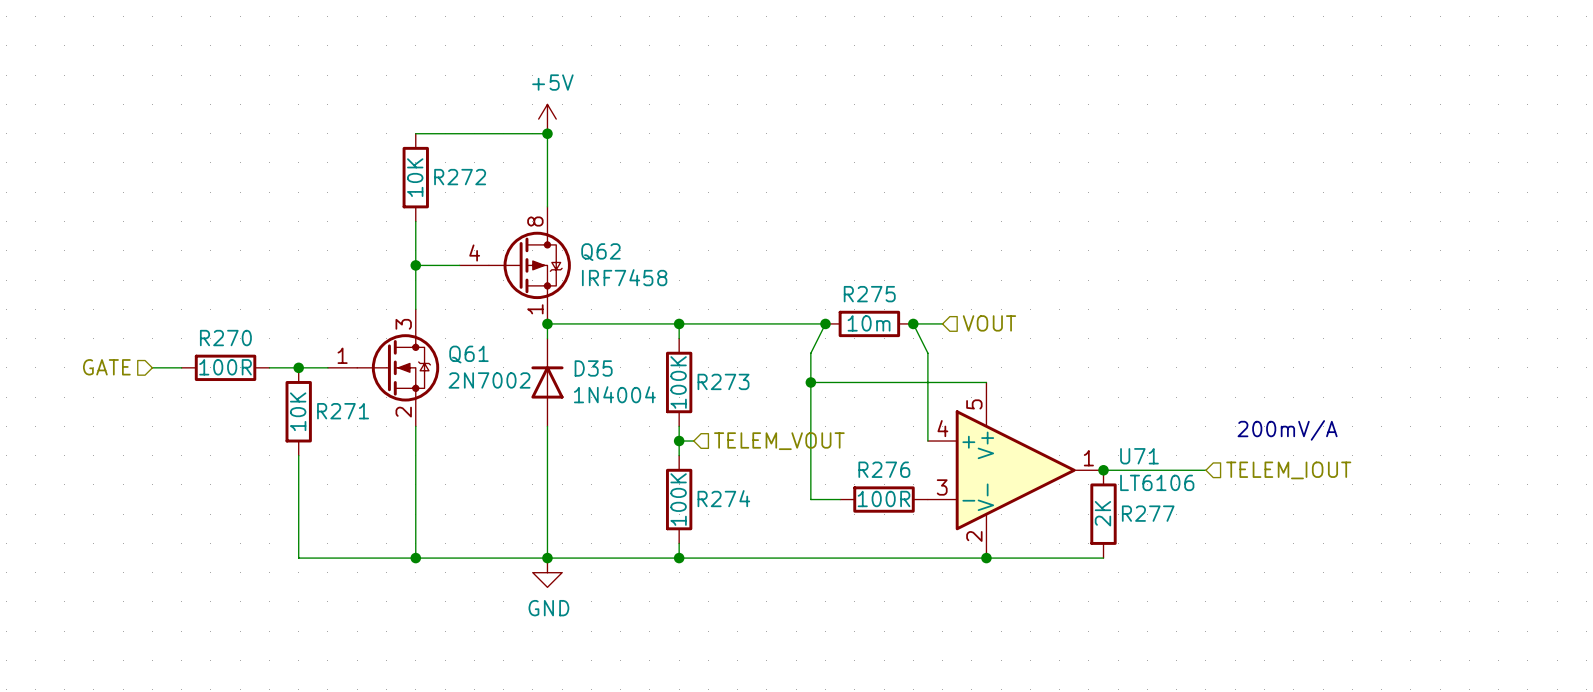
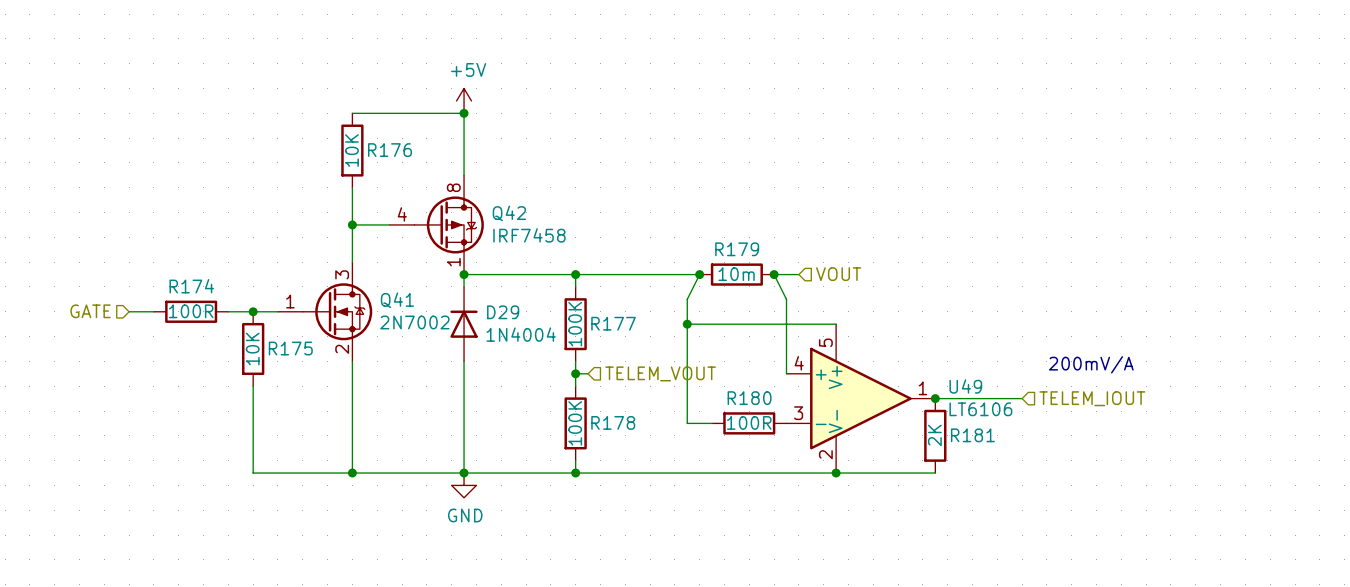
R272 name: R272 (460, 177) -> R176 (390, 150)
Q62 name: Q62 (600, 252) -> Q42 (509, 213)
R275 name: R275 (869, 294) -> R179 (737, 249)
R270 name: R270 (225, 338) -> R174 (191, 286)
Q61 name: Q61 (468, 354) -> Q41 (397, 300)
D35 name: D35 (593, 368) -> D29 (503, 312)
R273 name: R273 (723, 381) -> R177 (613, 323)
R271 name: R271 (343, 411) -> R175 (290, 348)
U71 name: U71 (1139, 456) -> U49 (965, 386)
R276 name: R276 (884, 469) -> R180 (749, 398)
R274 name: R274 (723, 498) -> R178 (613, 422)
R277 name: R277 (1148, 513) -> R181 (972, 435)

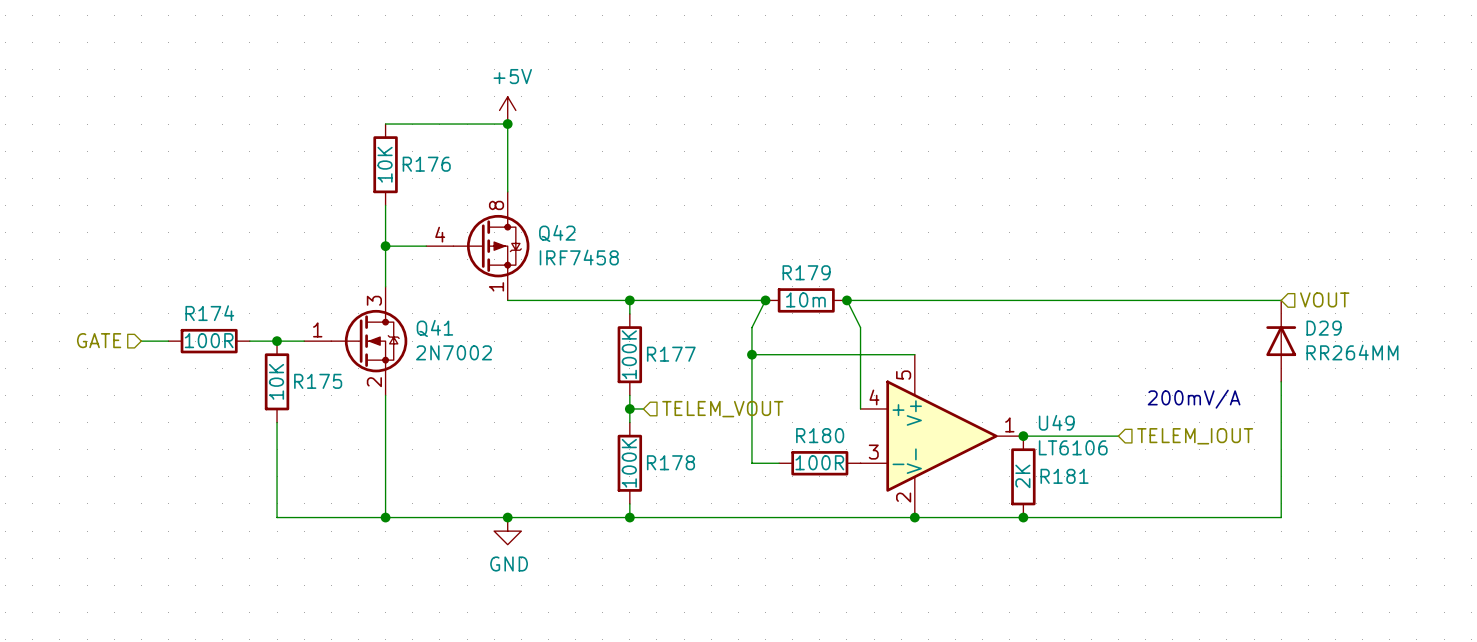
wire: (464, 274) (464, 286) -> none
junction: (464, 274) -> none
wire: none -> (874, 300) (1281, 300)
hierarchical label: VOUT (838, 274) -> none
hierarchical label: none -> VOUT (1324, 299)
D29 position: (464, 324) -> (1281, 341)
D29 value: 1N4004 (521, 334) -> RR264MM (1352, 352)
wire: none -> (1281, 381) (1281, 517) (1023, 517)
wire: (464, 361) (464, 473) -> none
junction: none -> (1023, 517)

